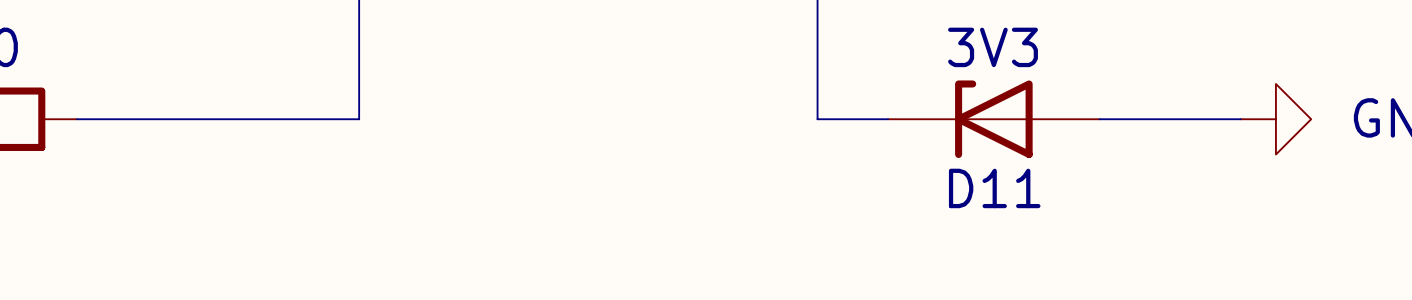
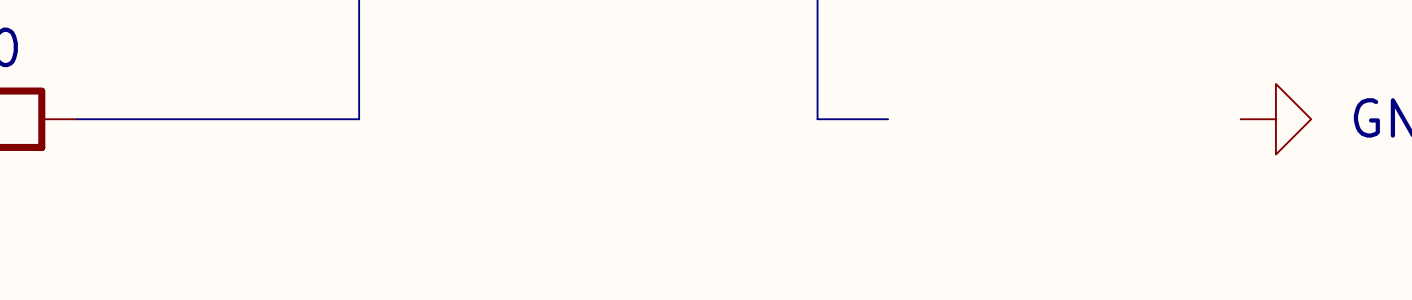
D11: 3V3 (993, 119) -> none
wire: (1099, 119) (1240, 119) -> none

